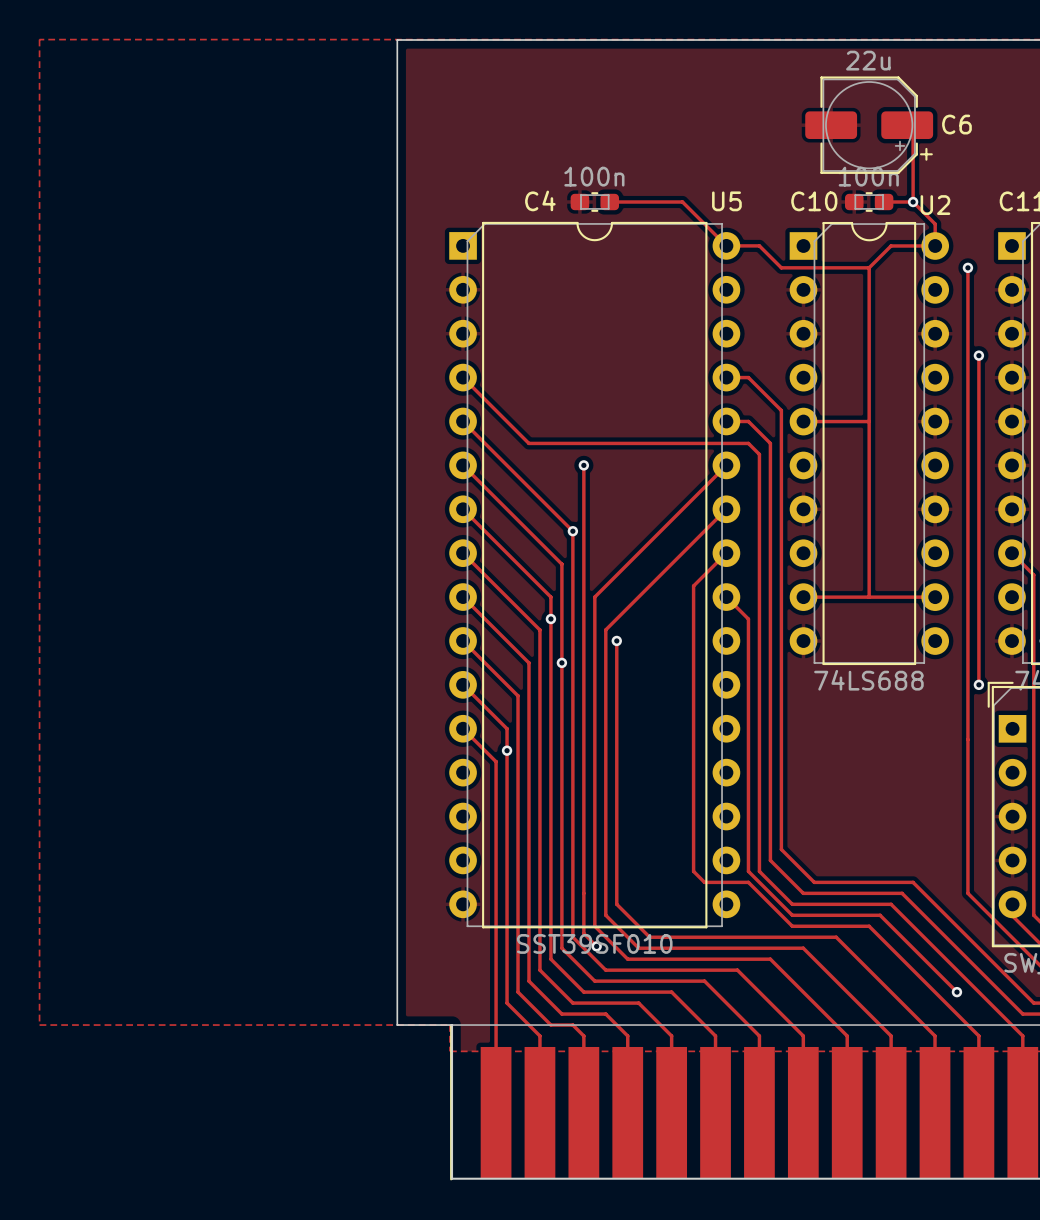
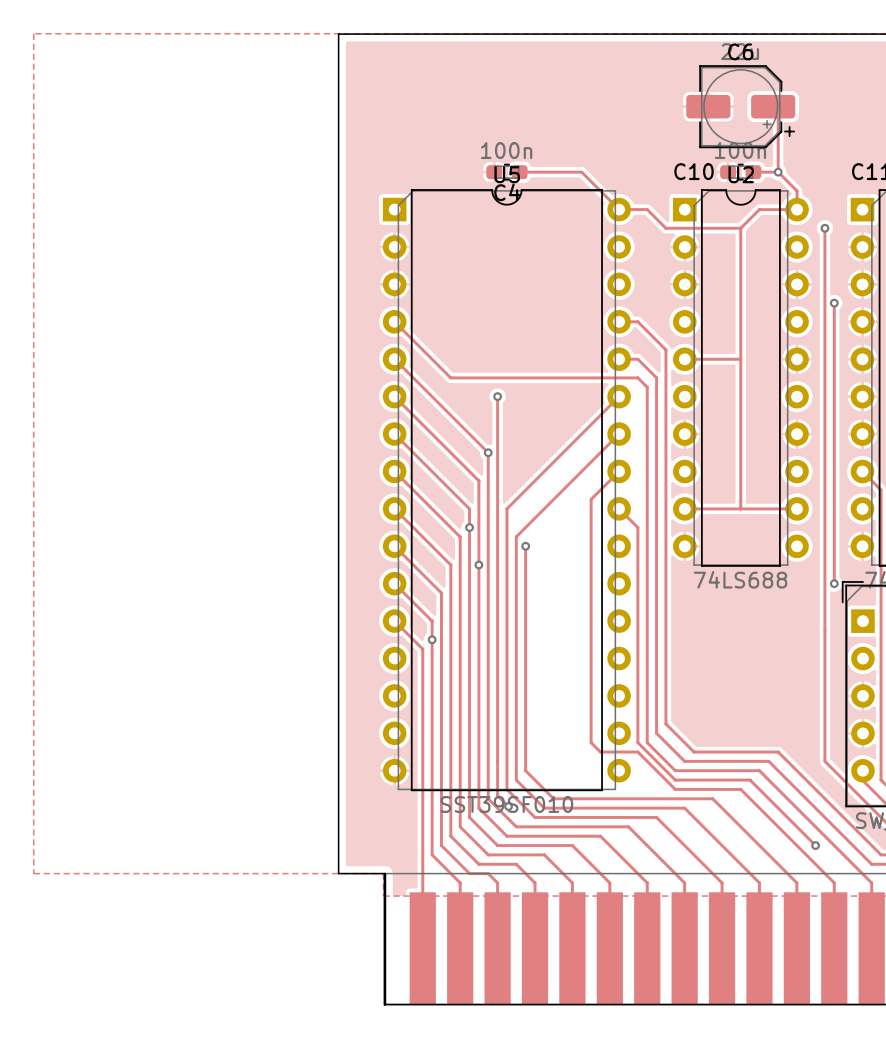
C6 name position: C6 (956, 124) -> C6 (740, 51)
C4 name position: C4 (540, 200) -> C4 (507, 192)
U5 name position: U5 (726, 201) -> U5 (507, 174)
U2 name position: U2 (935, 205) -> U2 (741, 174)

